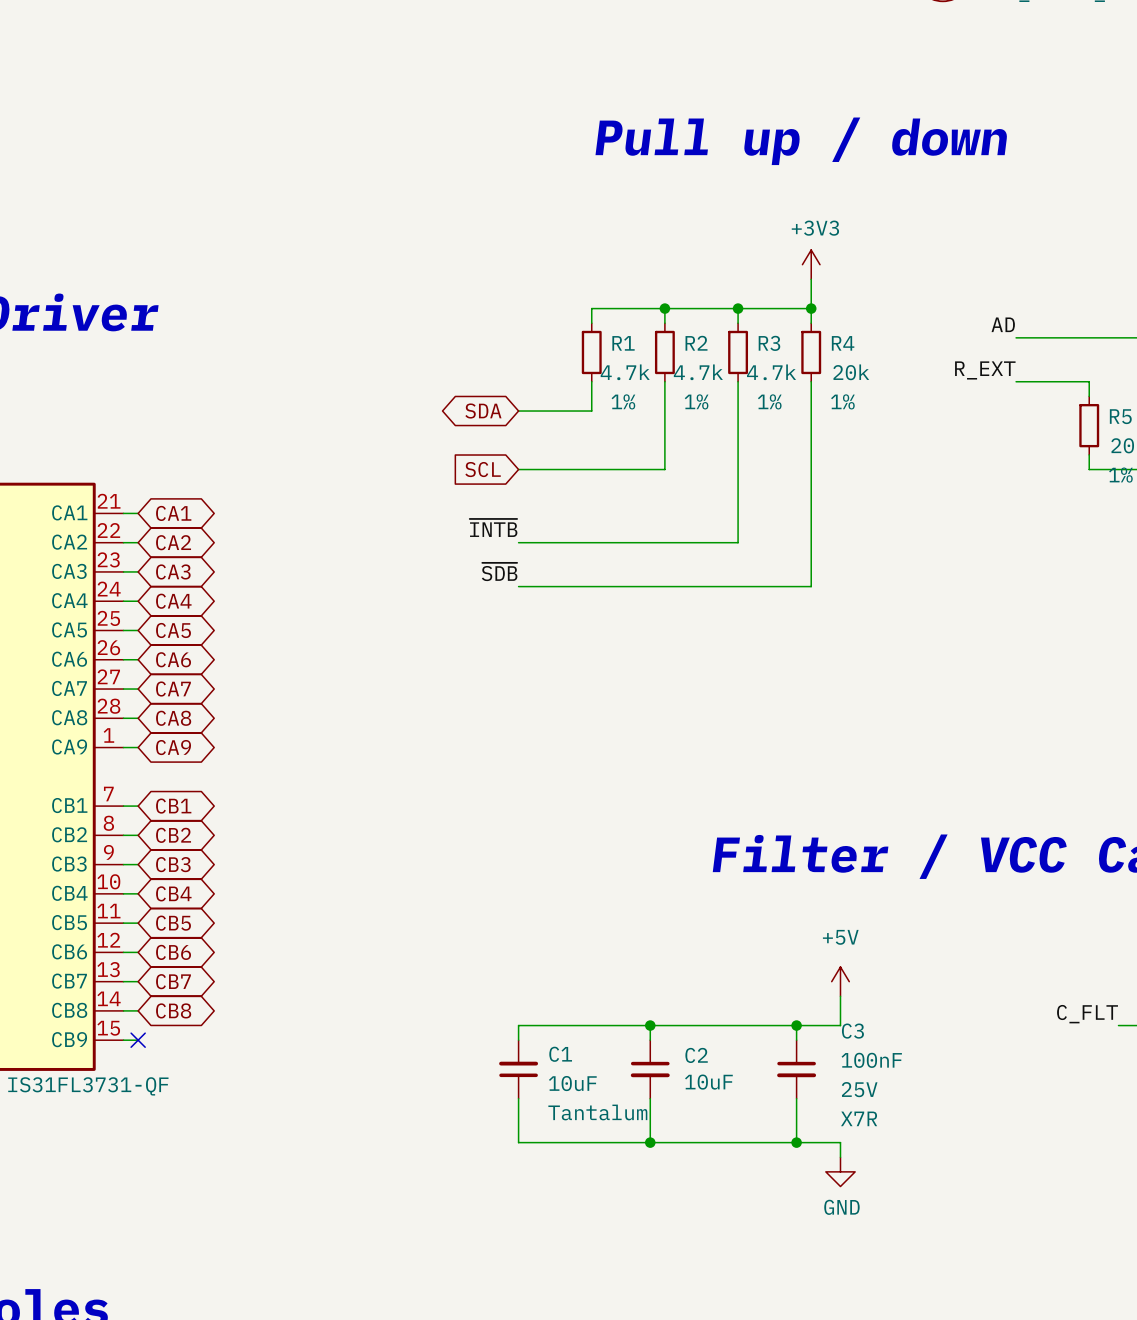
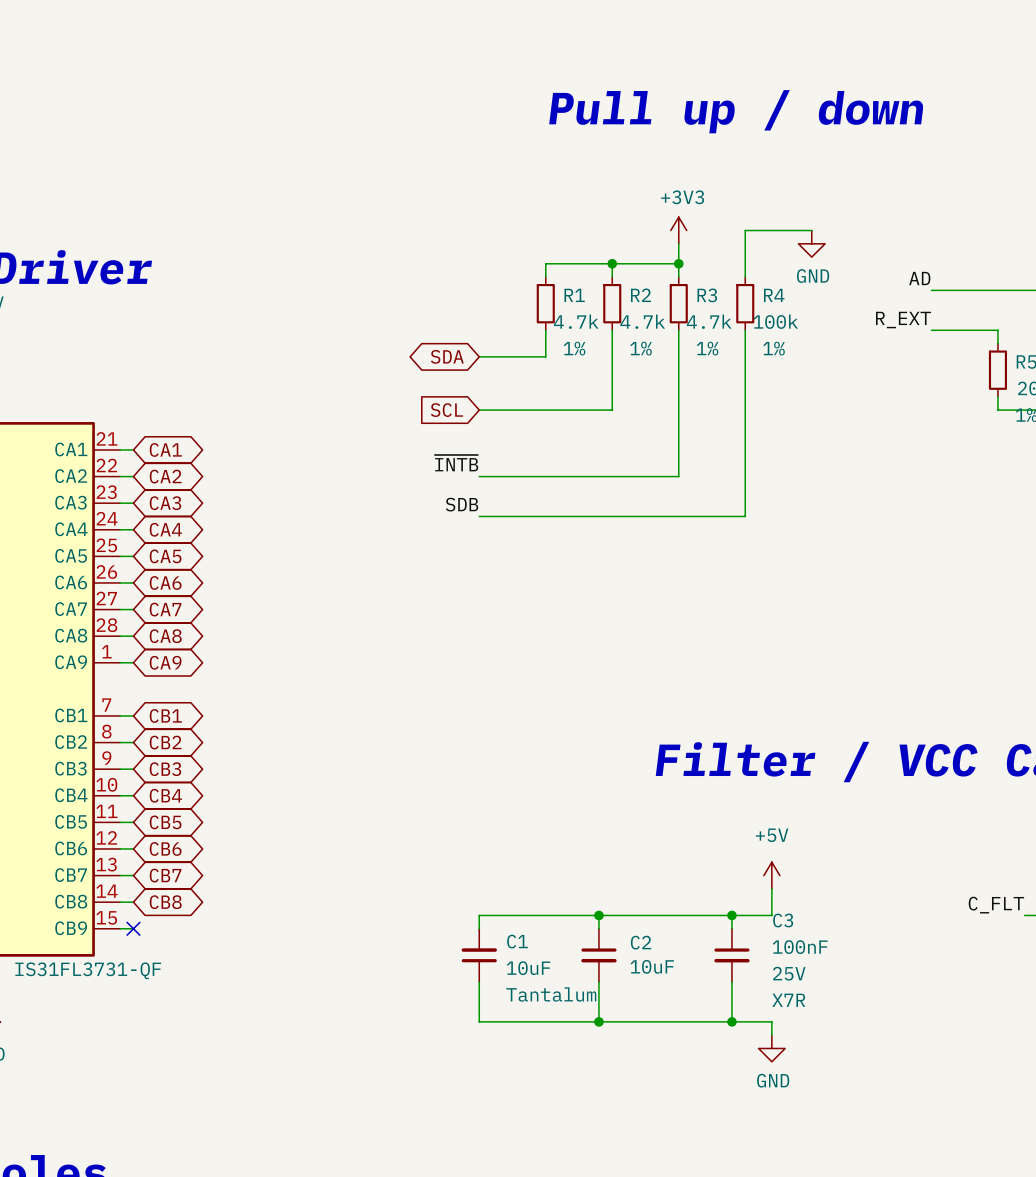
power symbol position: +3V3 (811, 264) -> +3V3 (678, 230)
wire: none -> (811, 230) (745, 230) (745, 237)
power symbol: none -> GND (811, 243)
wire: (738, 308) (811, 308) -> (678, 263) (678, 243)
junction: (811, 308) -> none
R4 value: 20k (851, 372) -> 100k (775, 321)
label: ~{SDB} (499, 571) -> SDB (462, 504)

